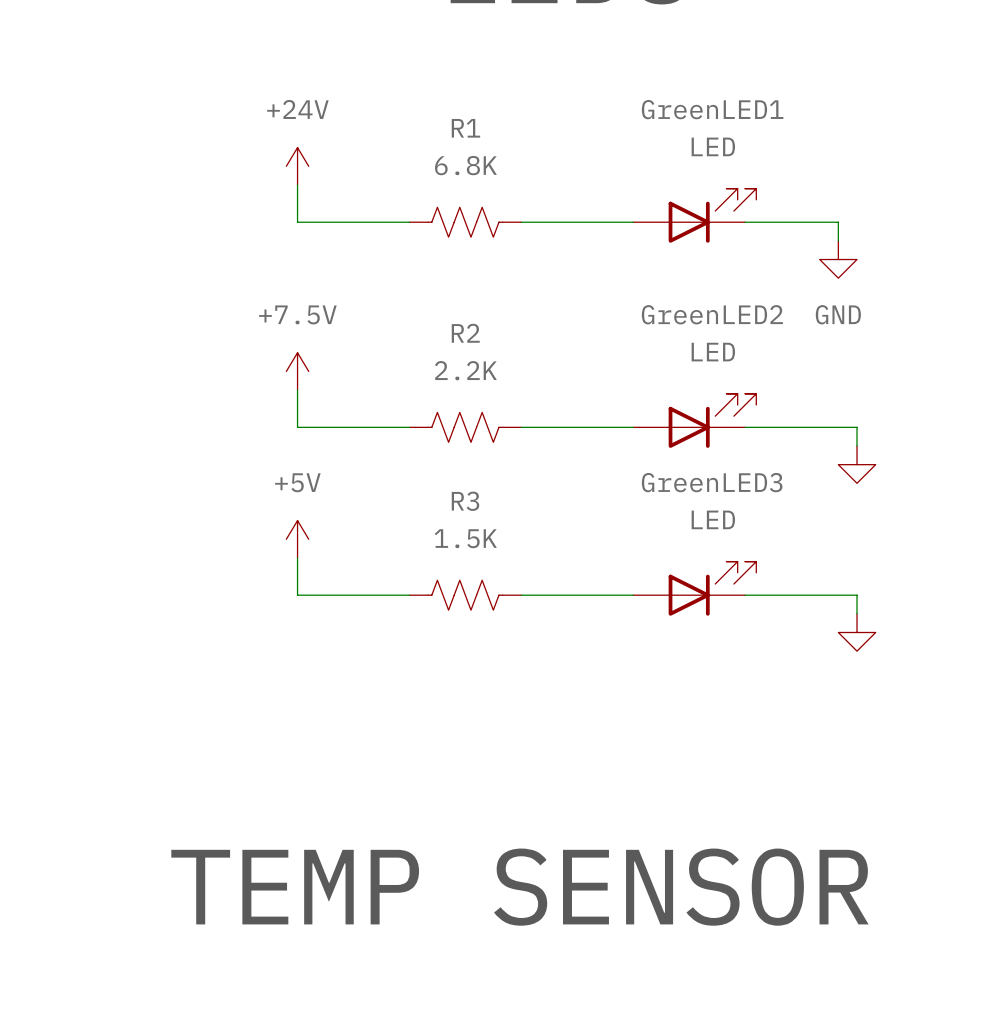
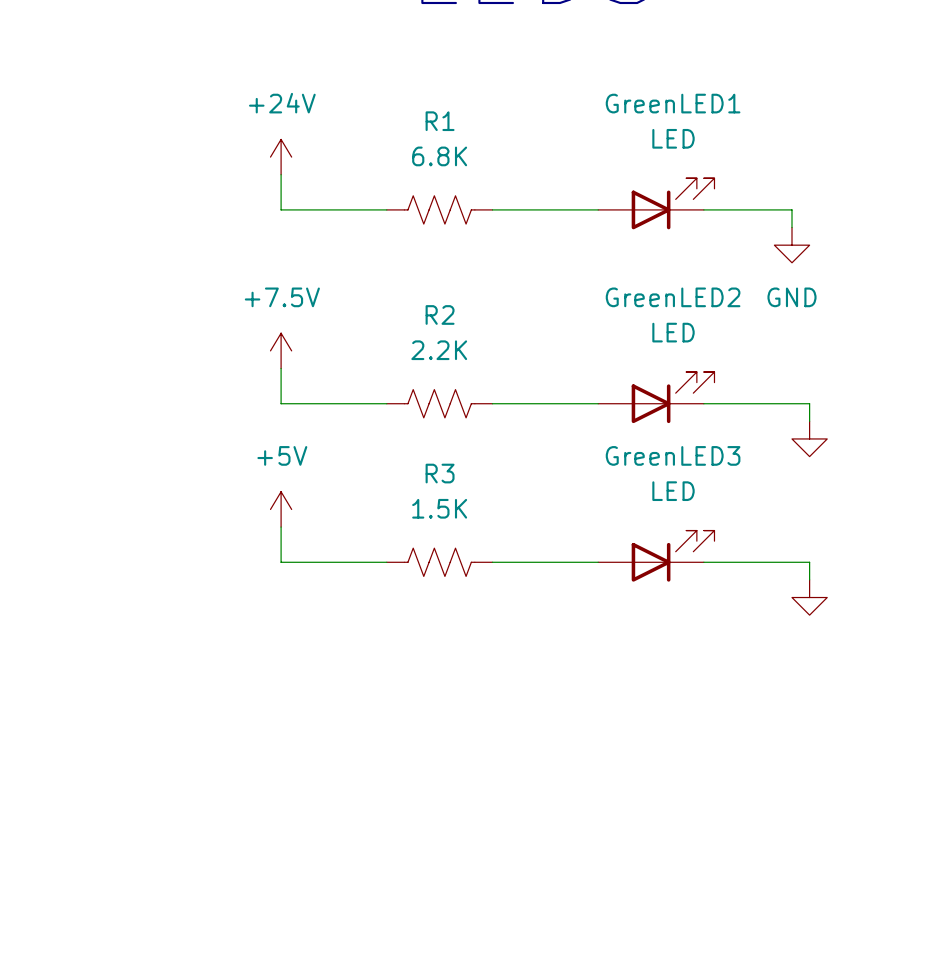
text: TEMP SENSOR (519, 887) -> none

